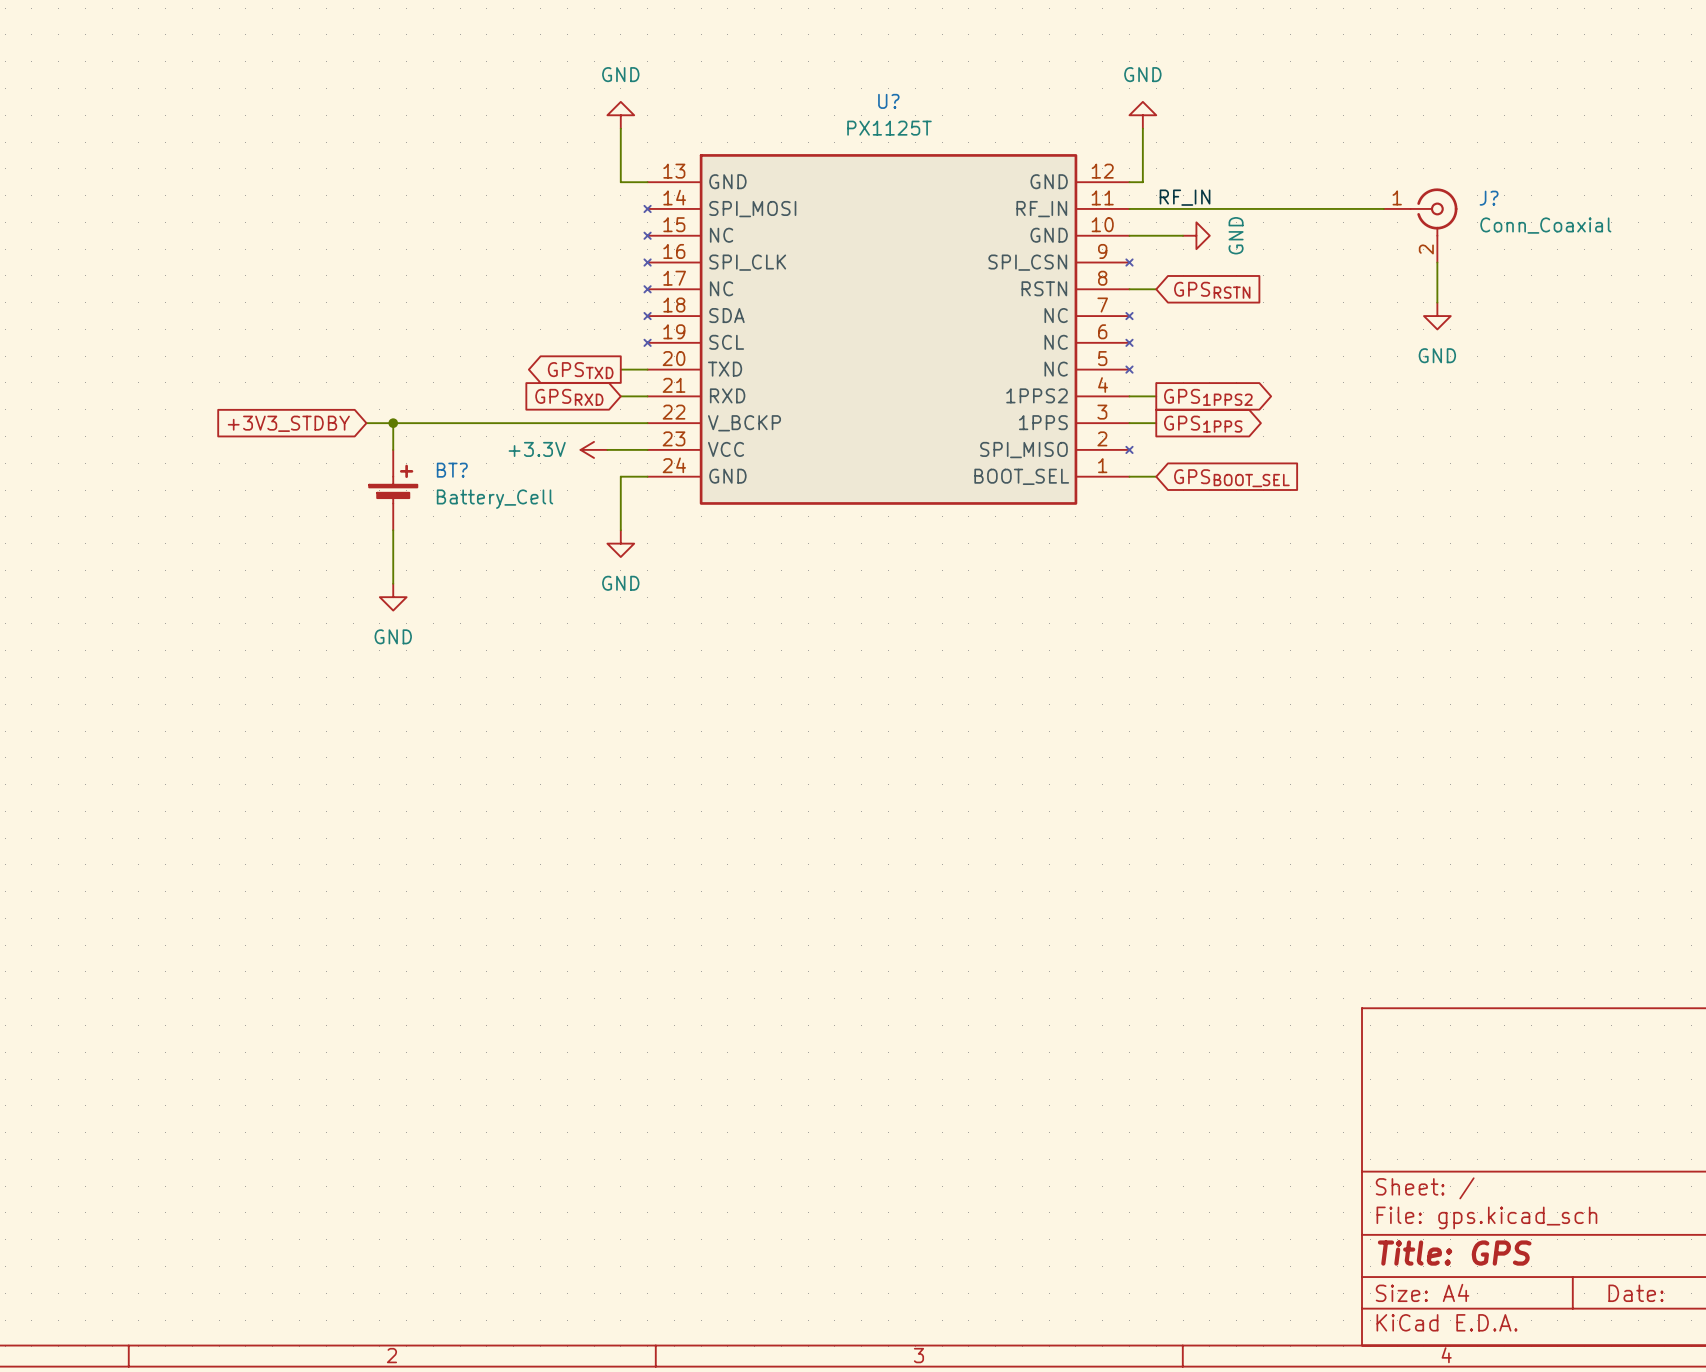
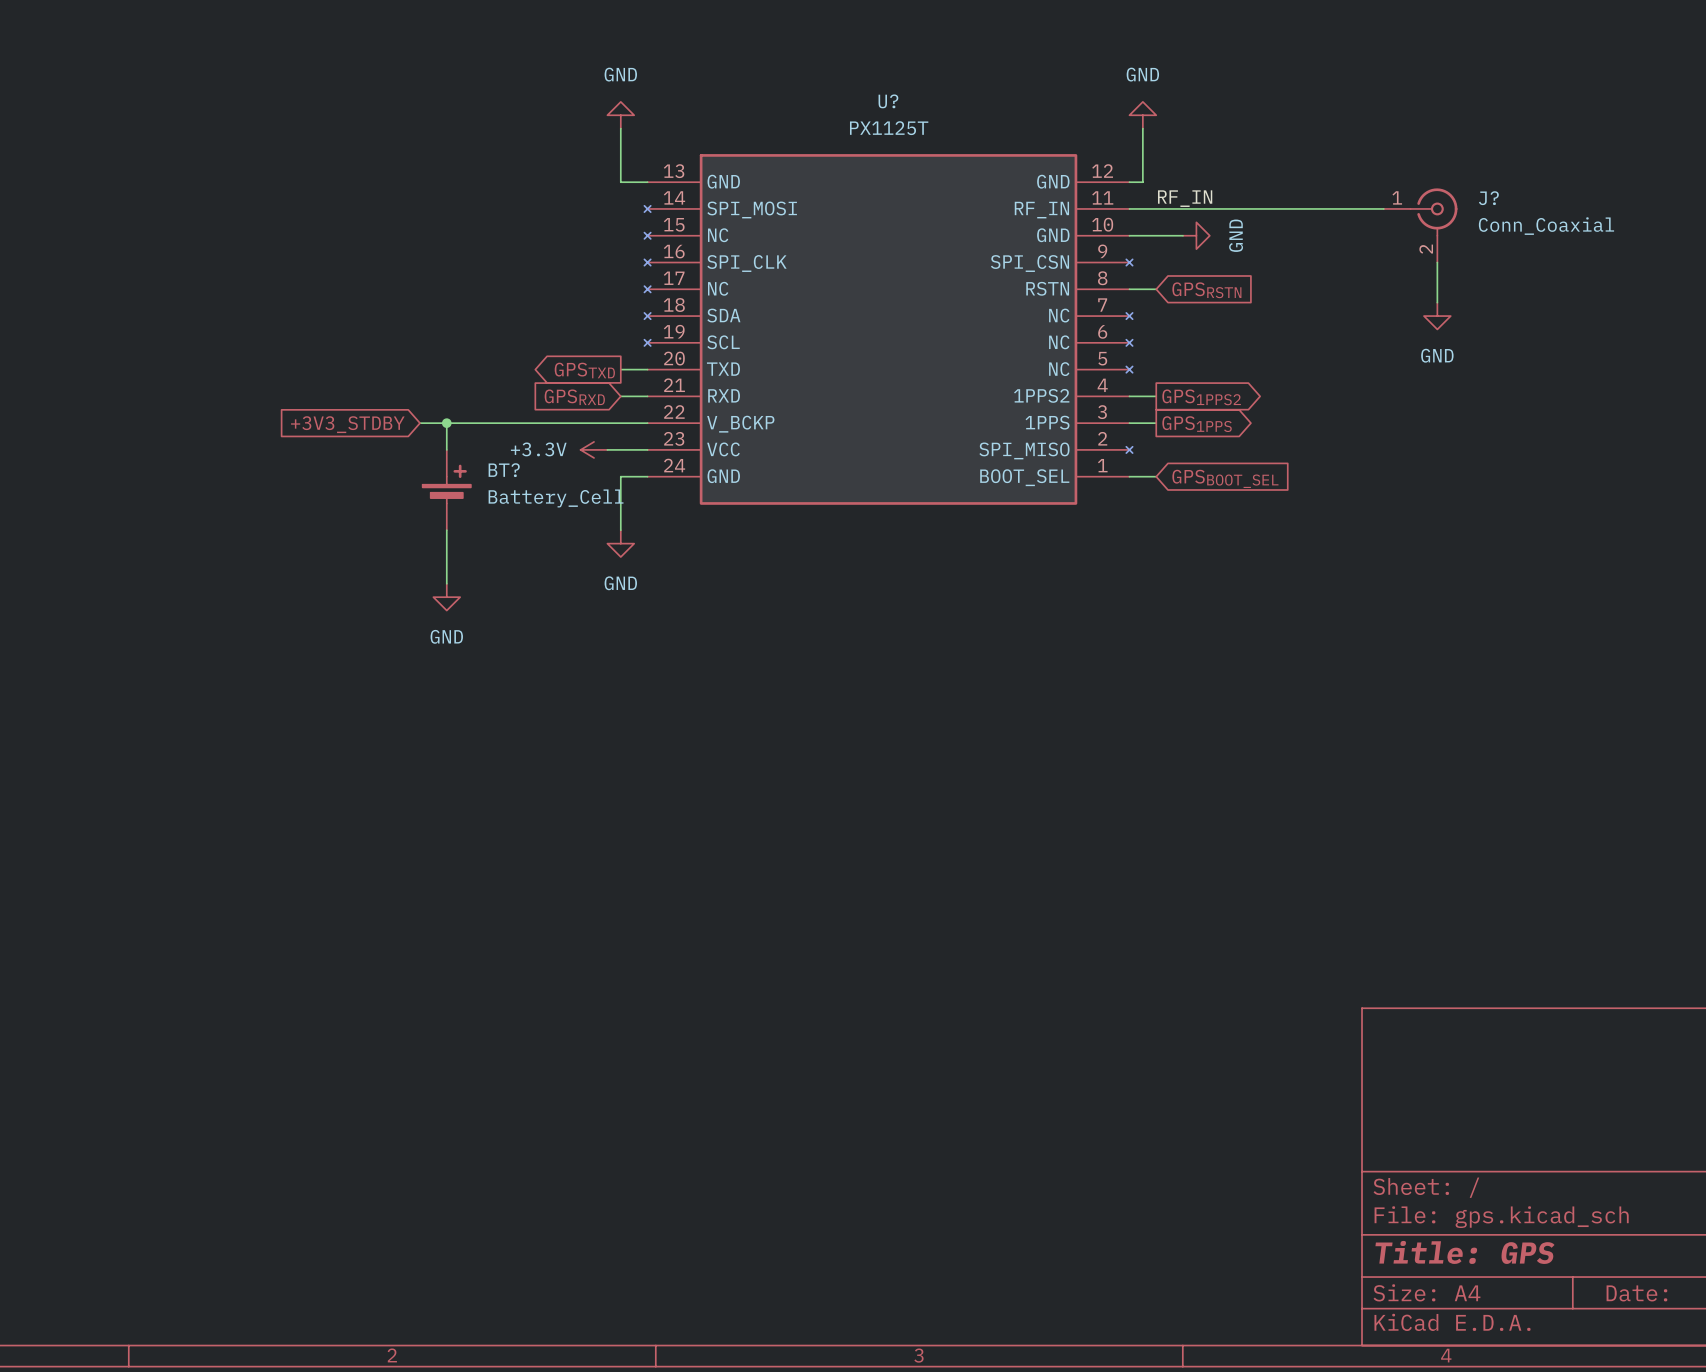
global label position: +3V3_STDBY (288, 423) -> +3V3_STDBY (347, 424)
wire: (366, 423) (420, 423) -> none
wire: (393, 423) (393, 449) -> (446, 423) (446, 449)
junction position: (393, 423) -> (446, 423)
BT? position: (393, 490) -> (446, 490)
wire: (393, 530) (393, 583) -> (446, 530) (446, 583)
power symbol position: GND (393, 597) -> GND (446, 597)

